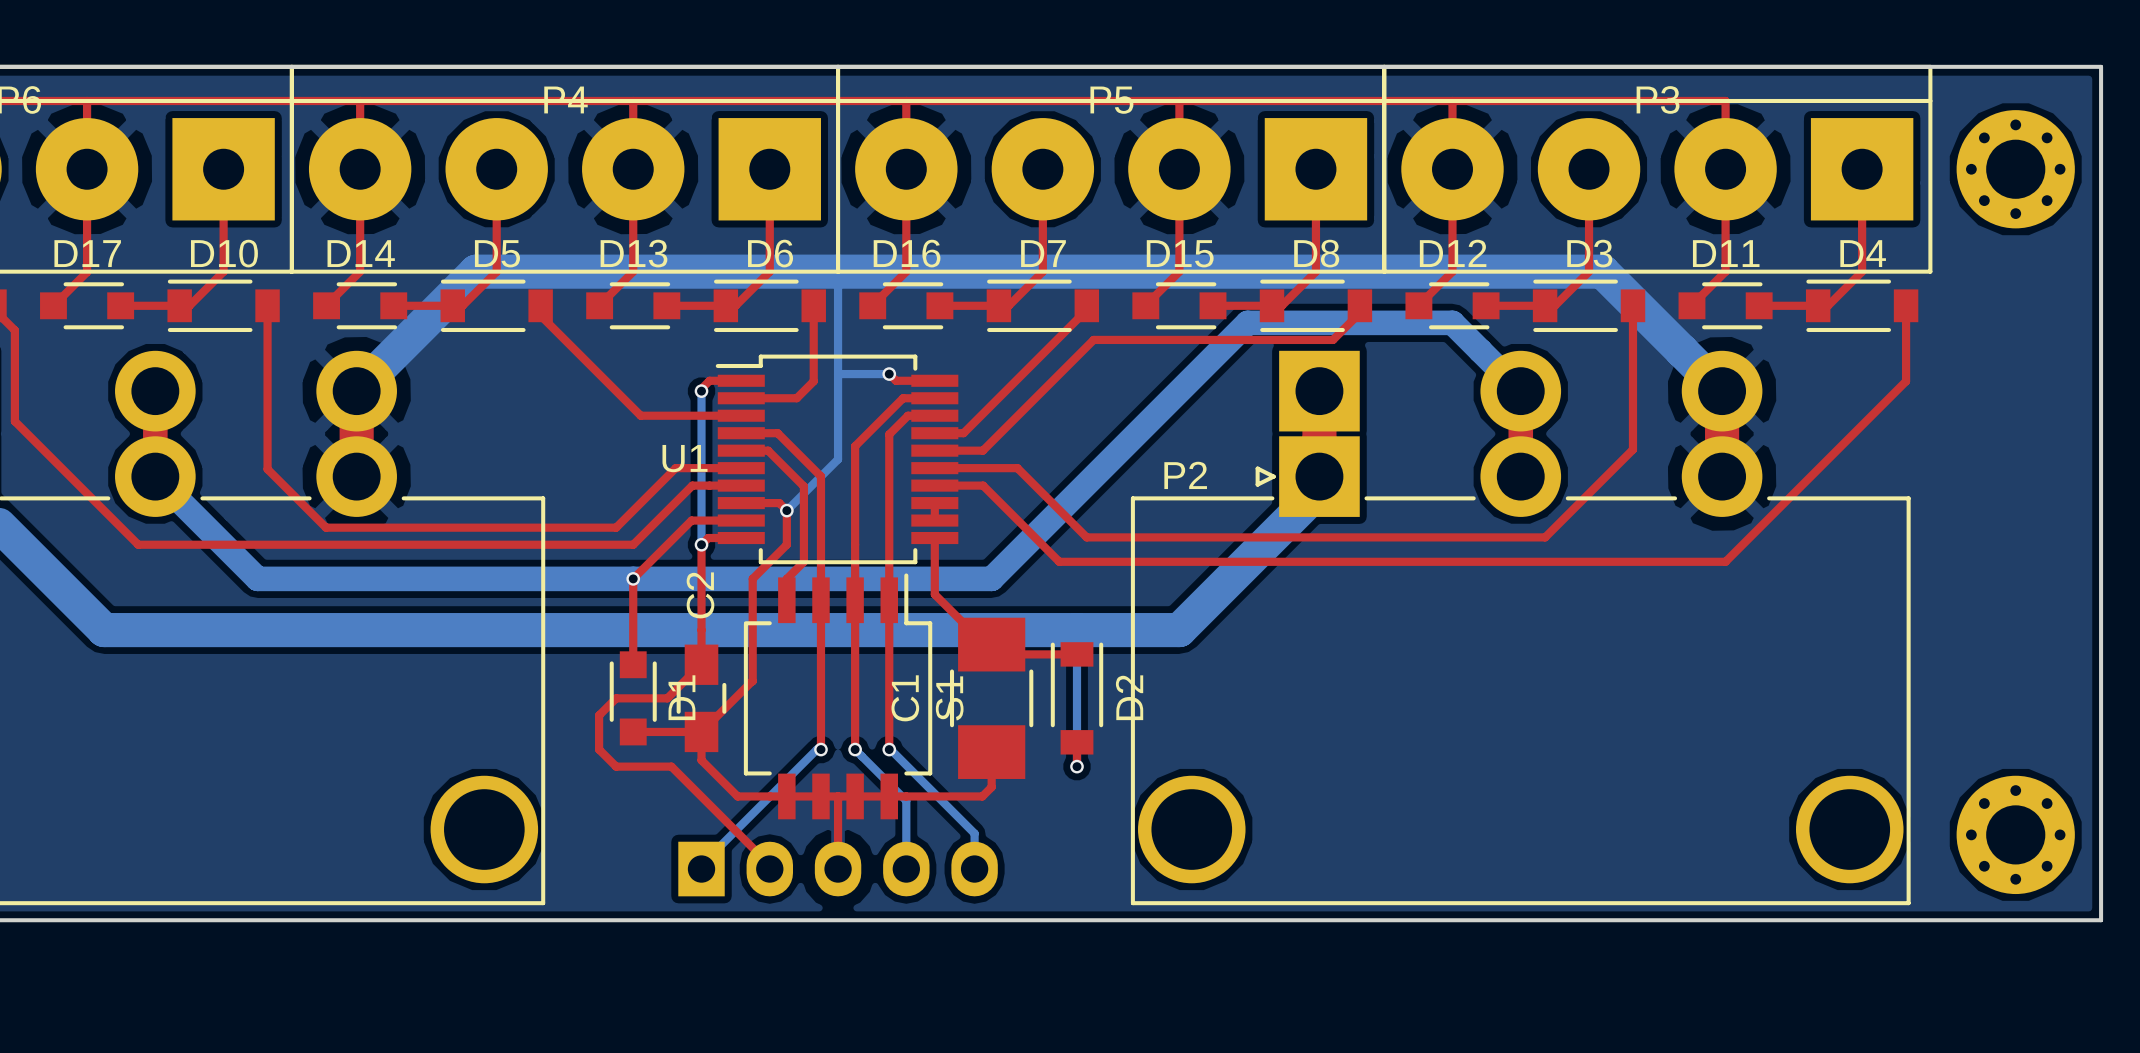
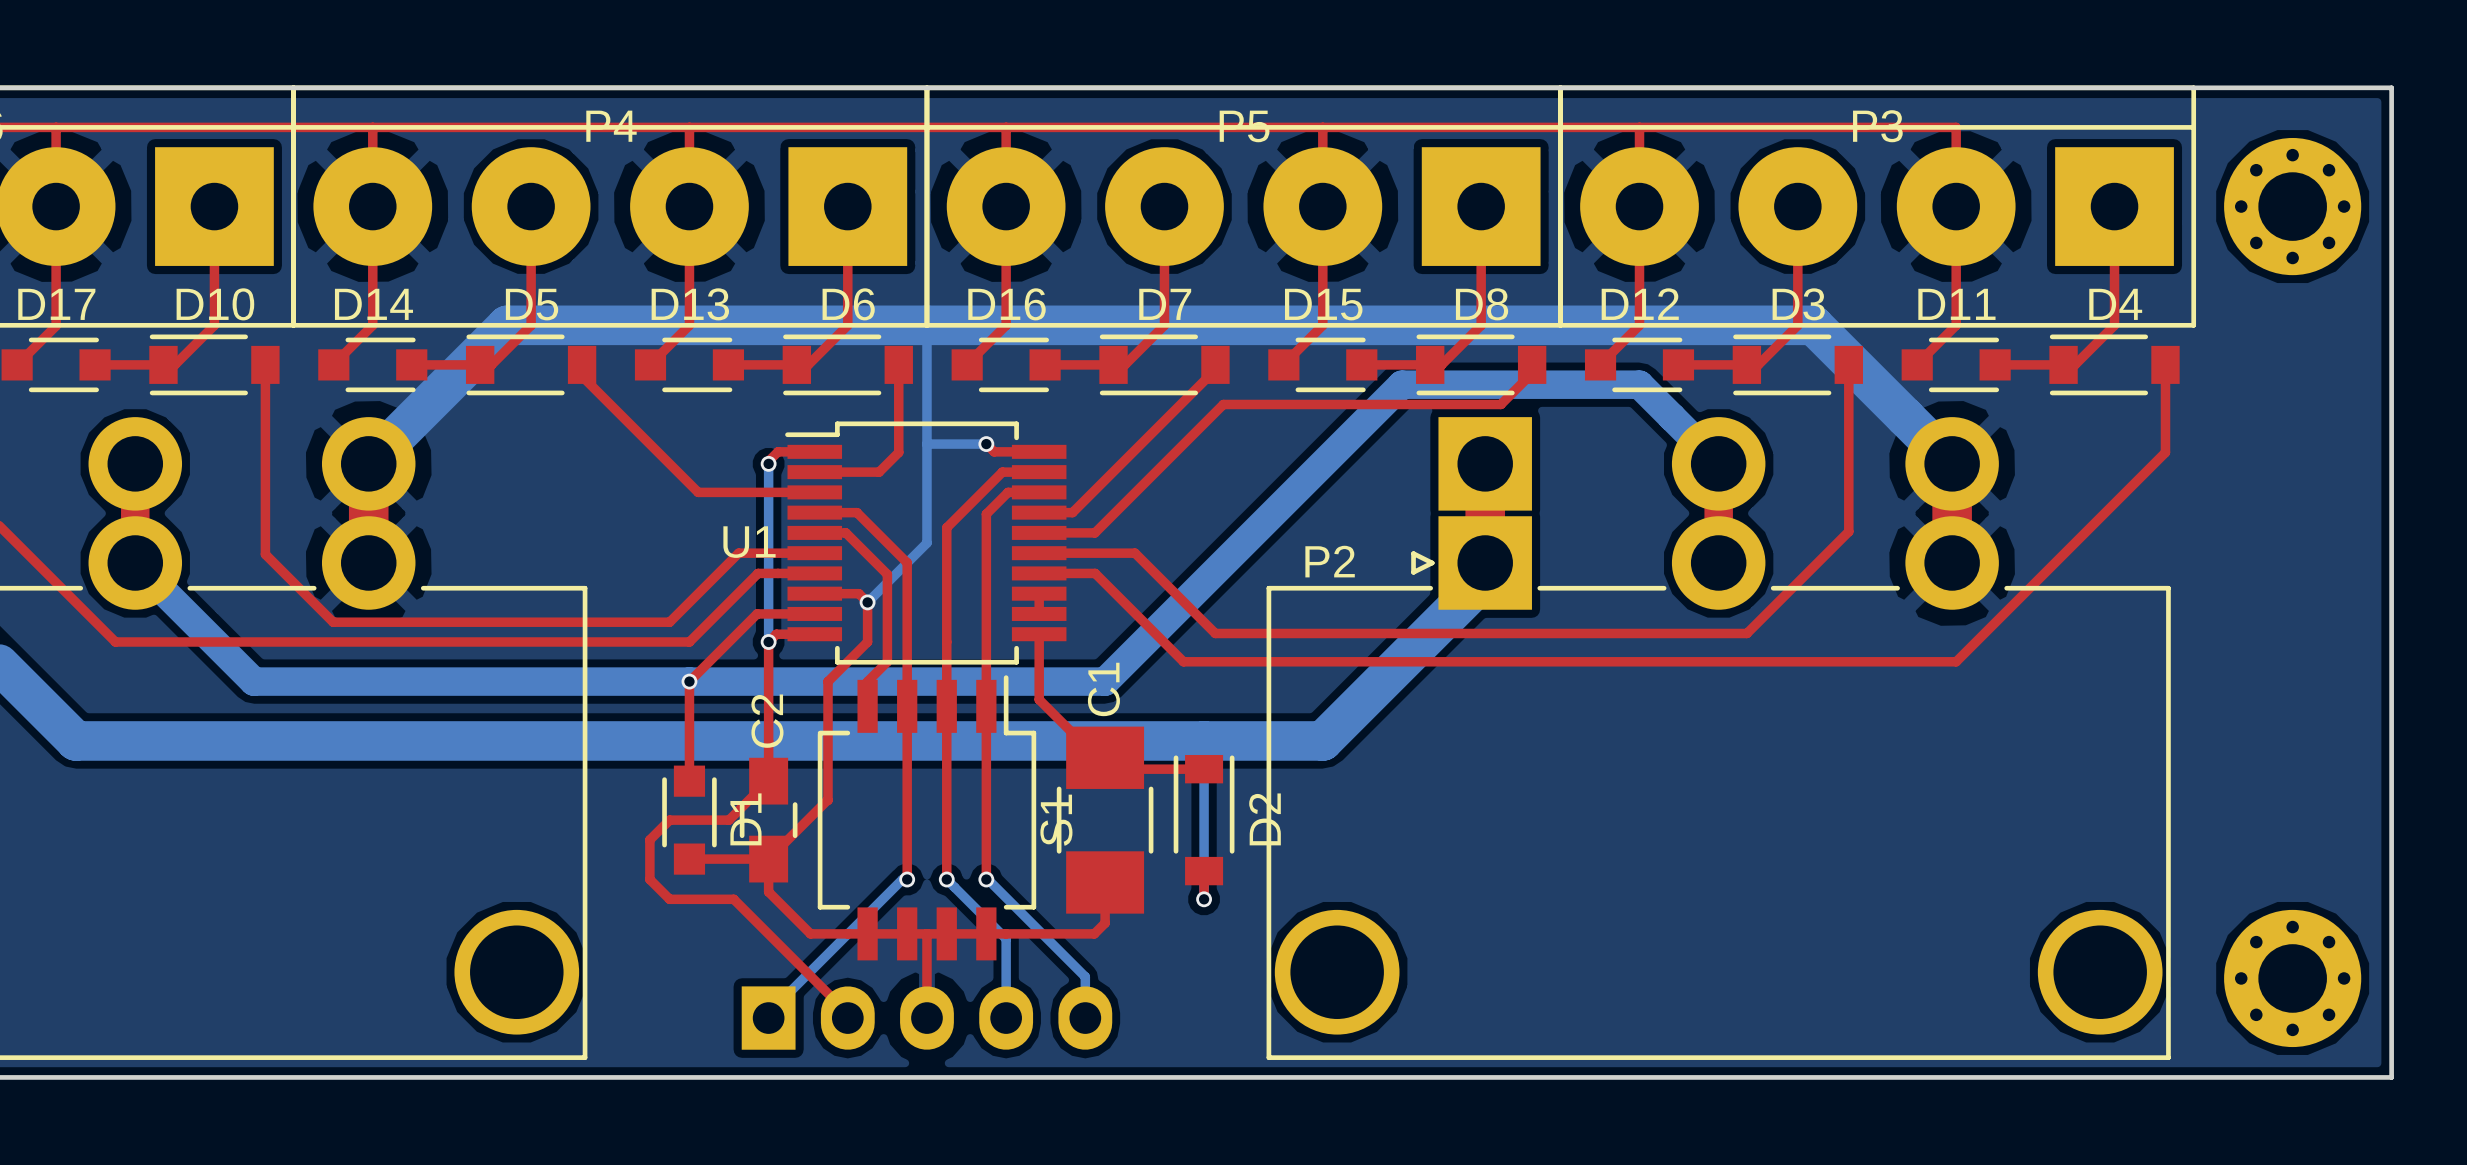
C2 name position: C2 (700, 595) -> C2 (767, 721)
C1 name position: C1 (905, 698) -> C1 (1103, 689)

